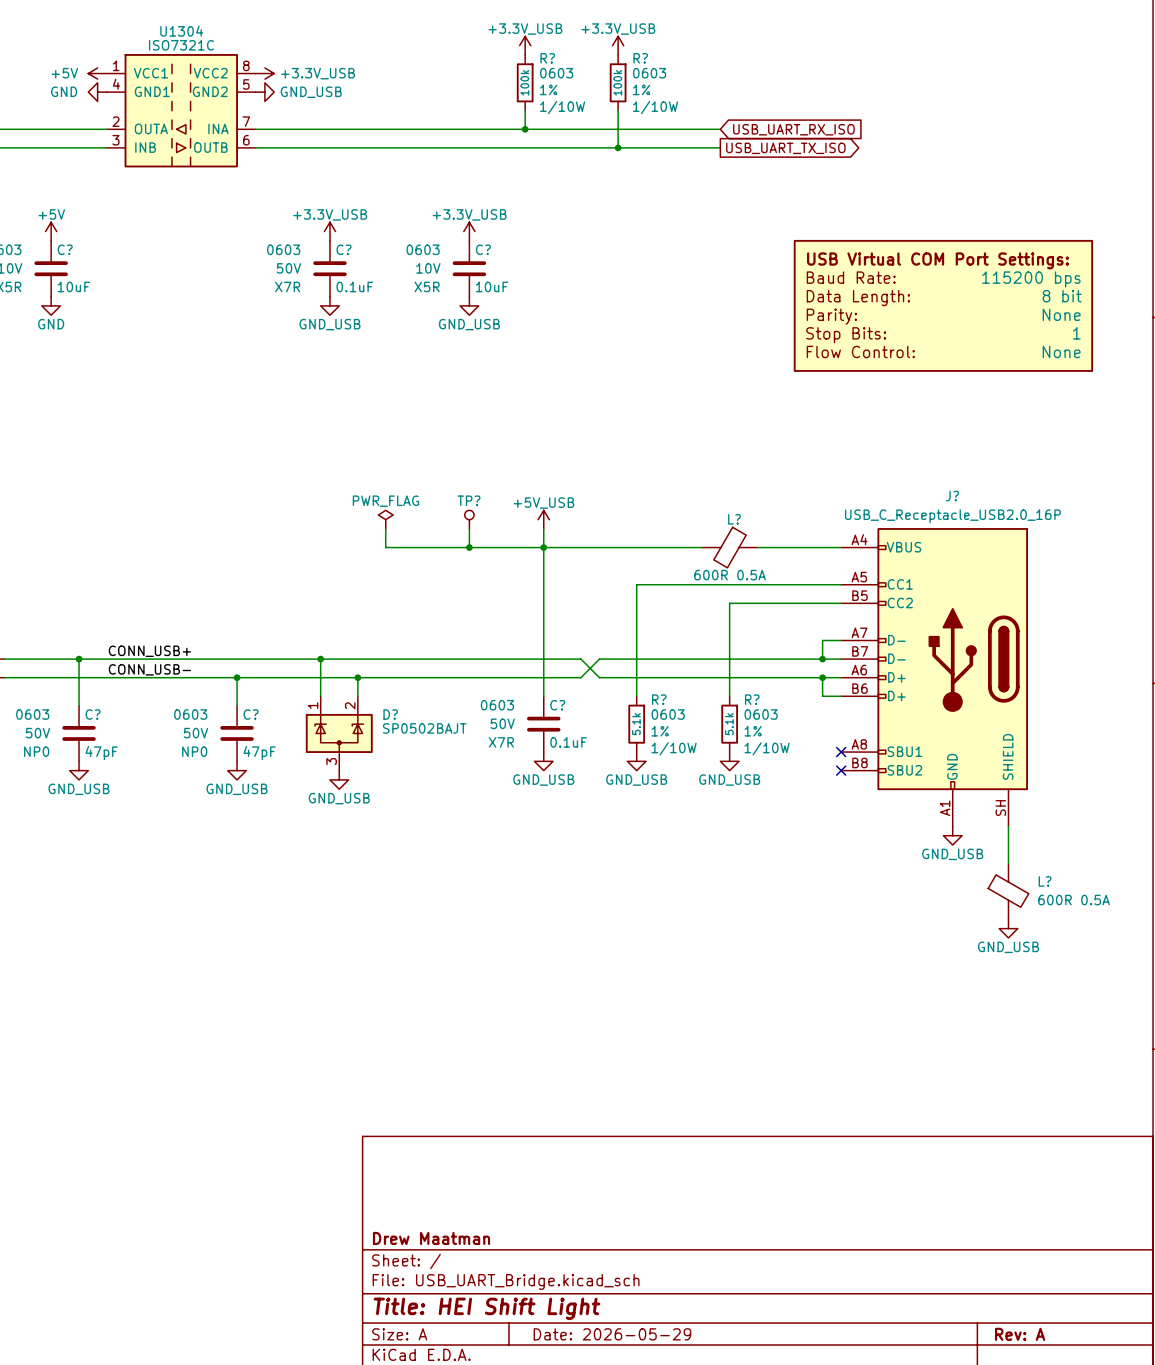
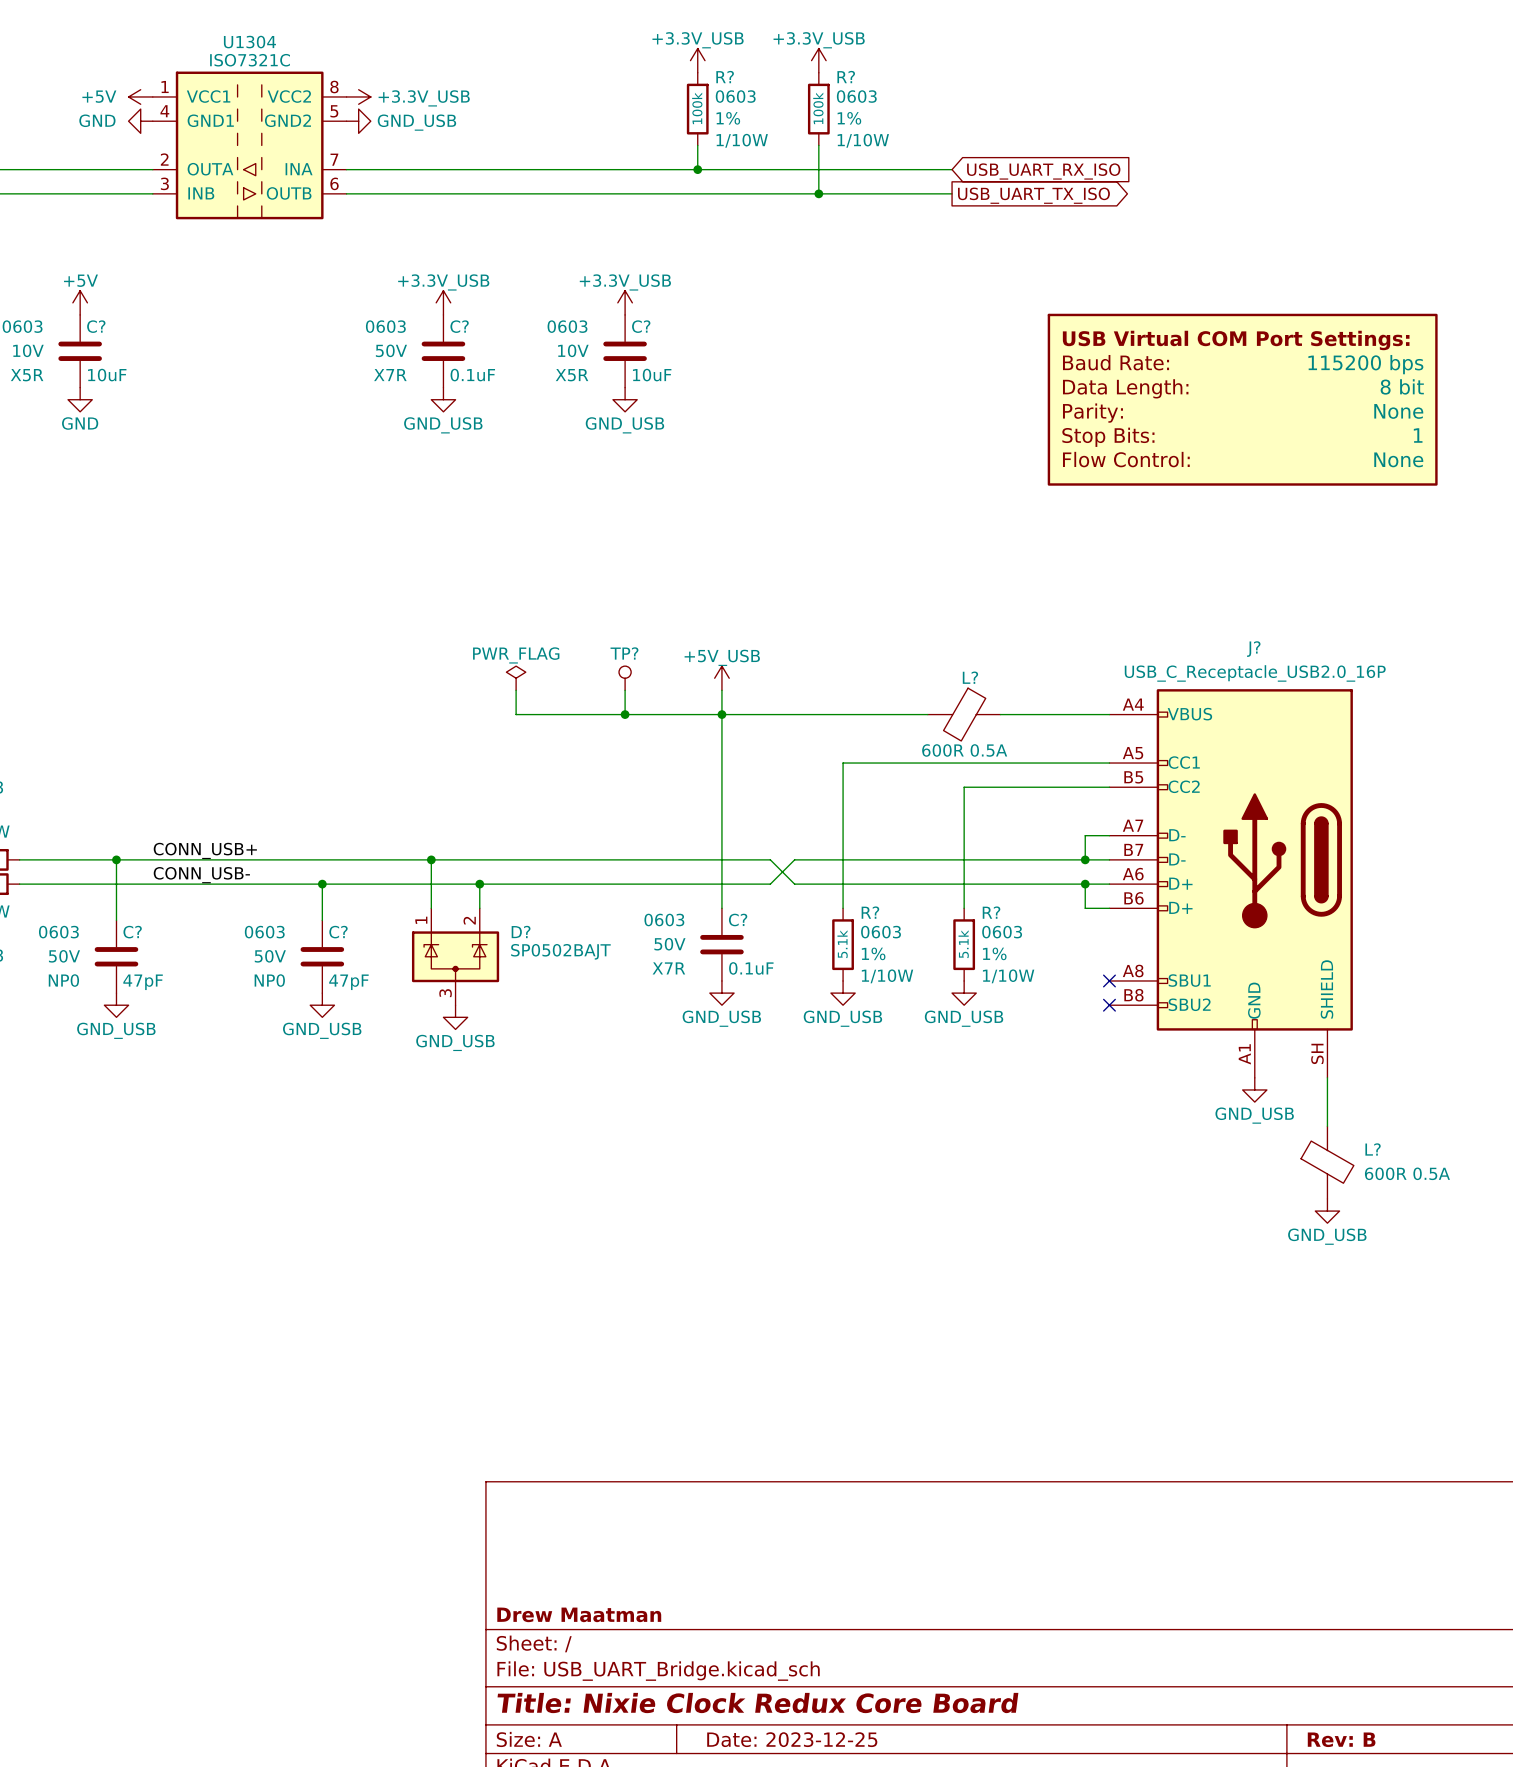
title block: Title: HEI Shift Light (487, 1308) -> Title: Nixie Clock Redux Core Board (757, 1703)
title block: Date: 2026-05-29 (612, 1334) -> Date: 2023-12-25 (792, 1739)
title block: Rev: A (1020, 1334) -> Rev: B (1341, 1739)

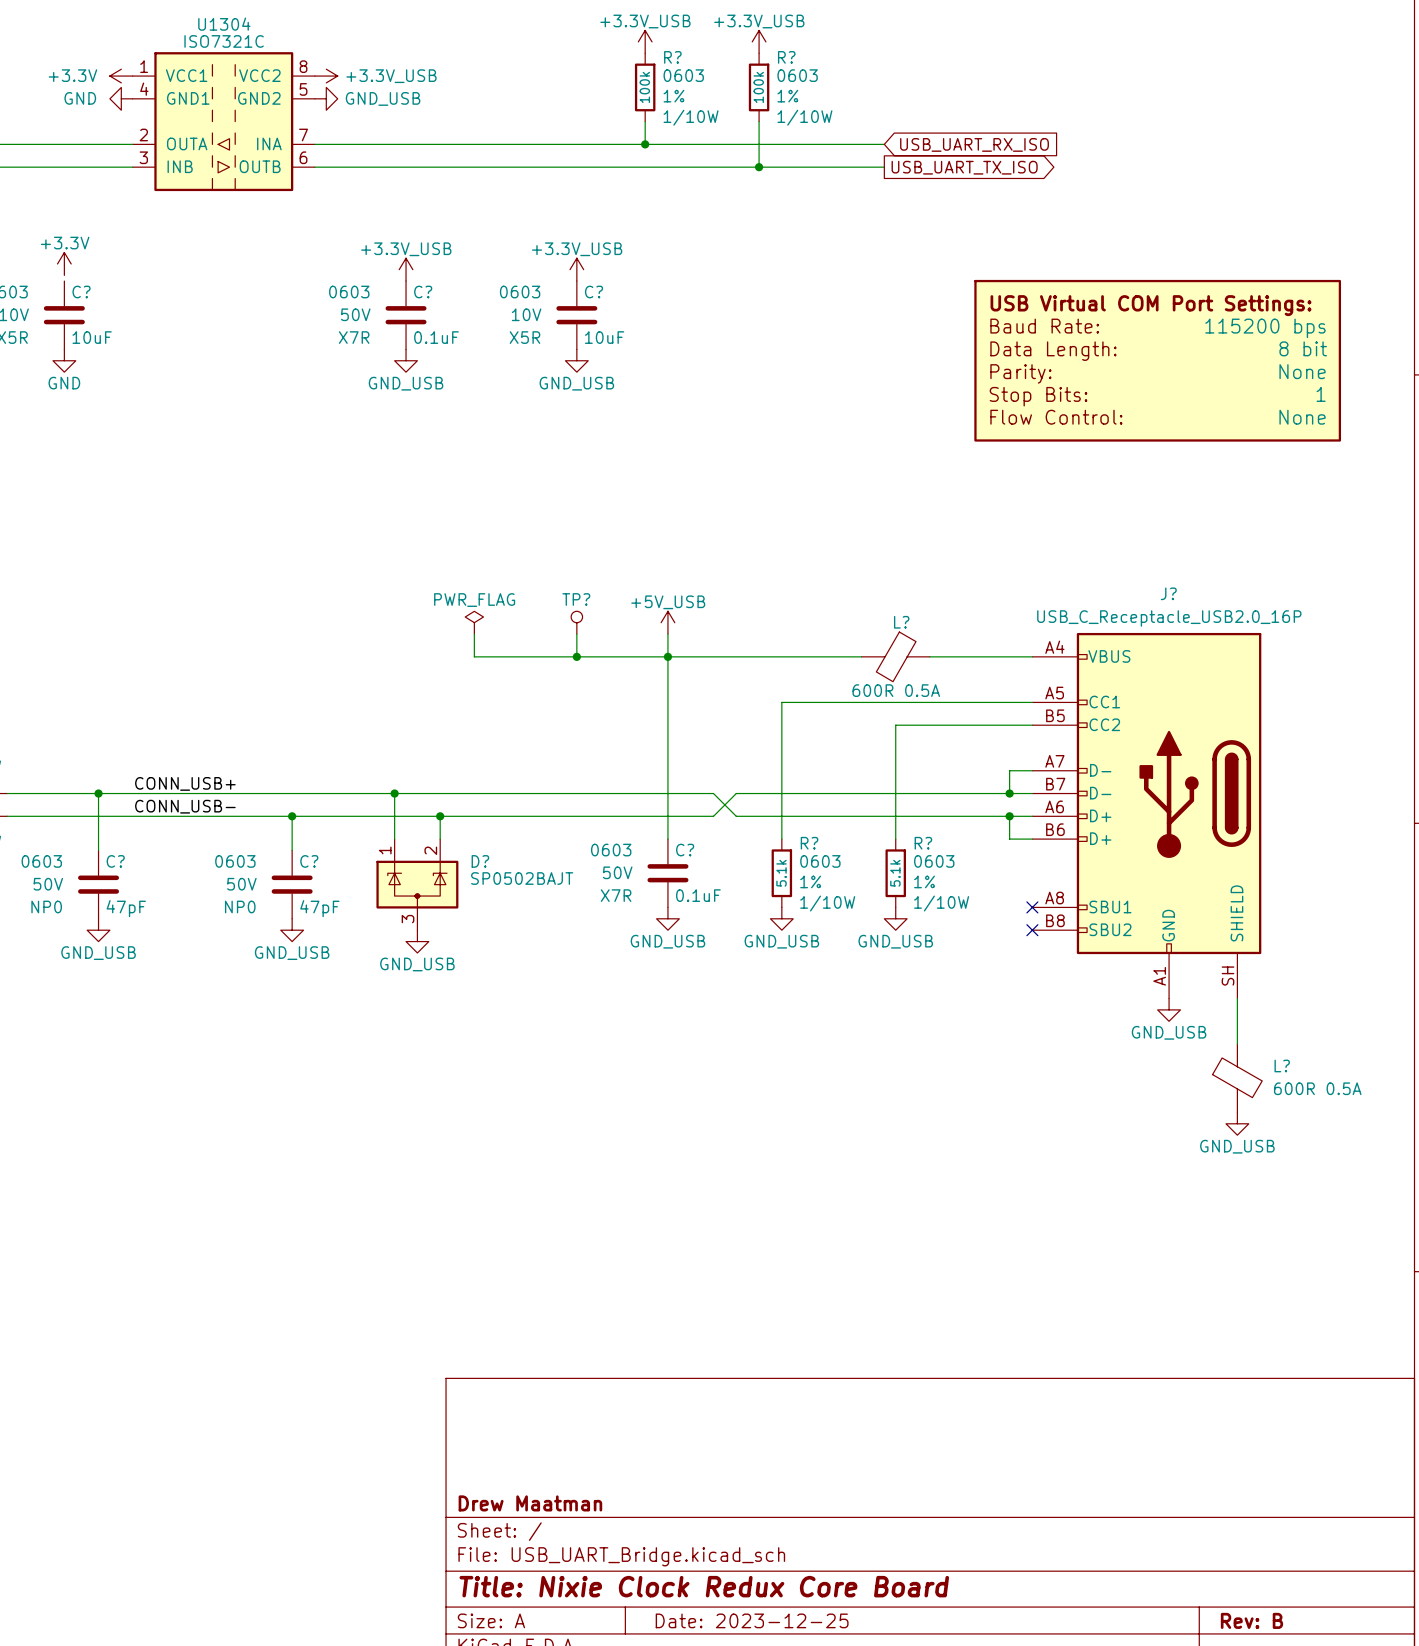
power symbol: +5V (140, 96) -> +3.3V (121, 76)
power symbol: +5V (80, 302) -> +3.3V (64, 263)

